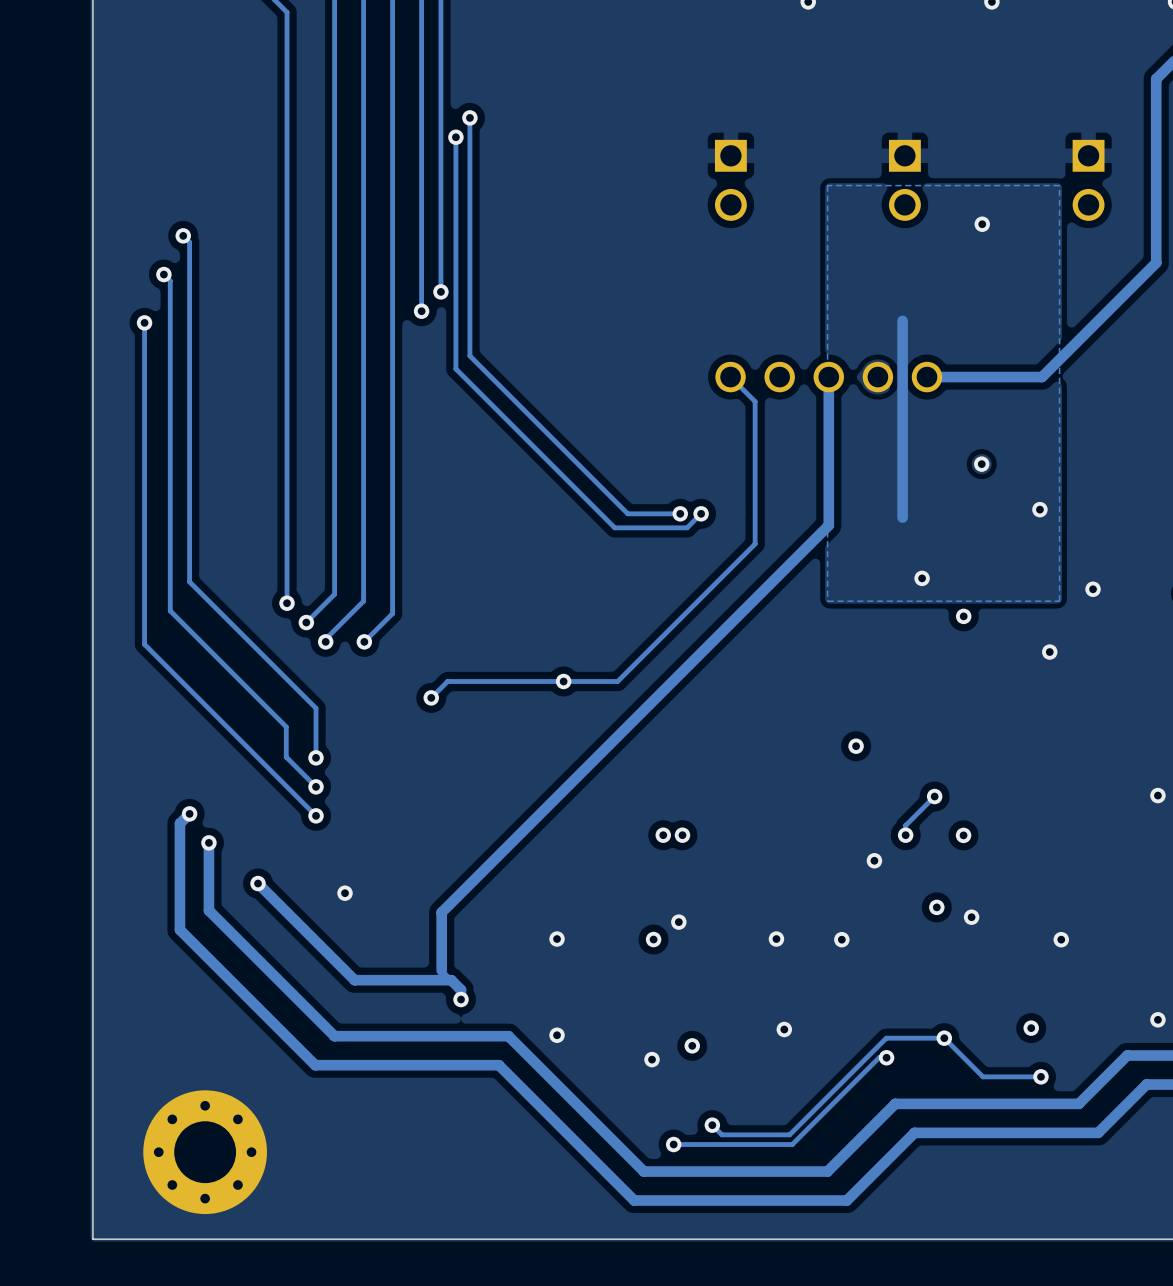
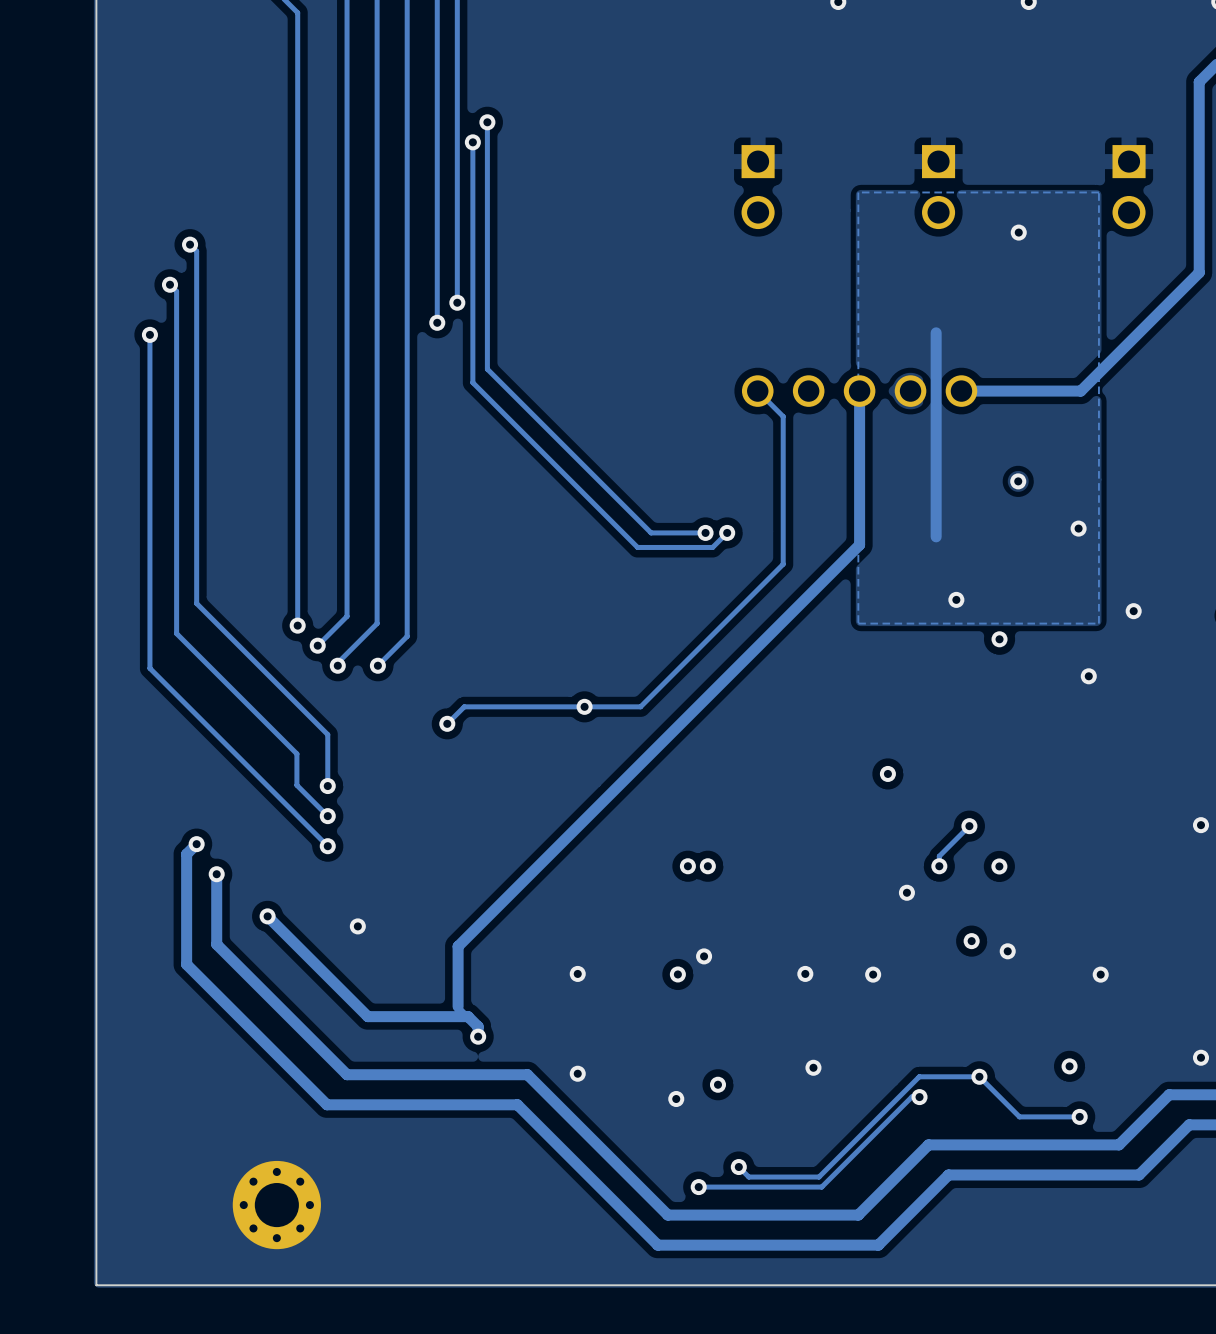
part: (205, 1152) -> none
part: none -> (276, 1205)

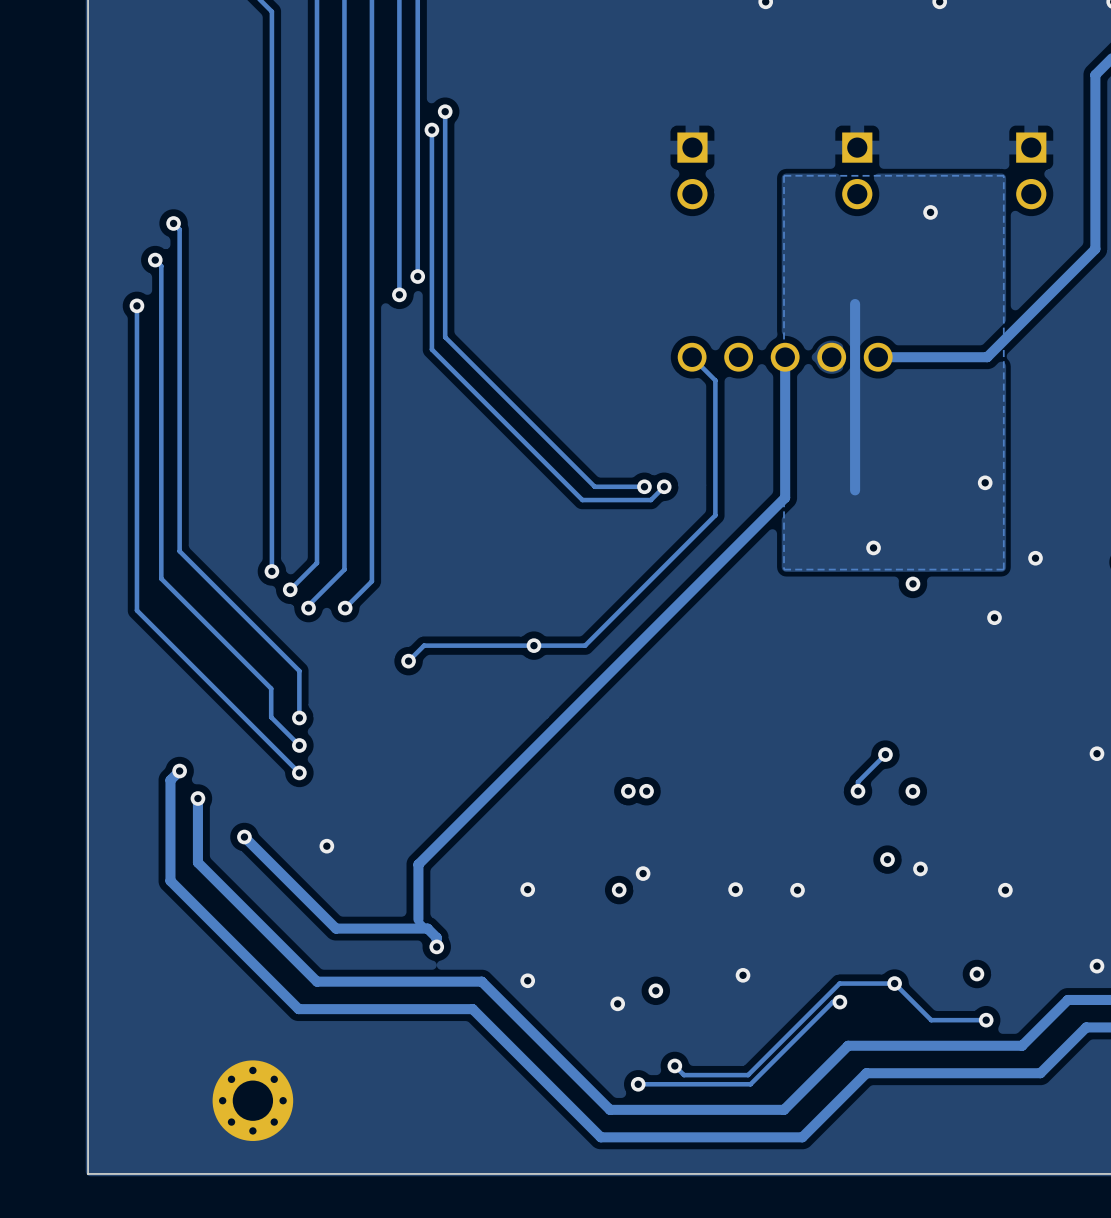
via: (1018, 481) -> none
via: (887, 773) -> none
via: (906, 892) -> none

